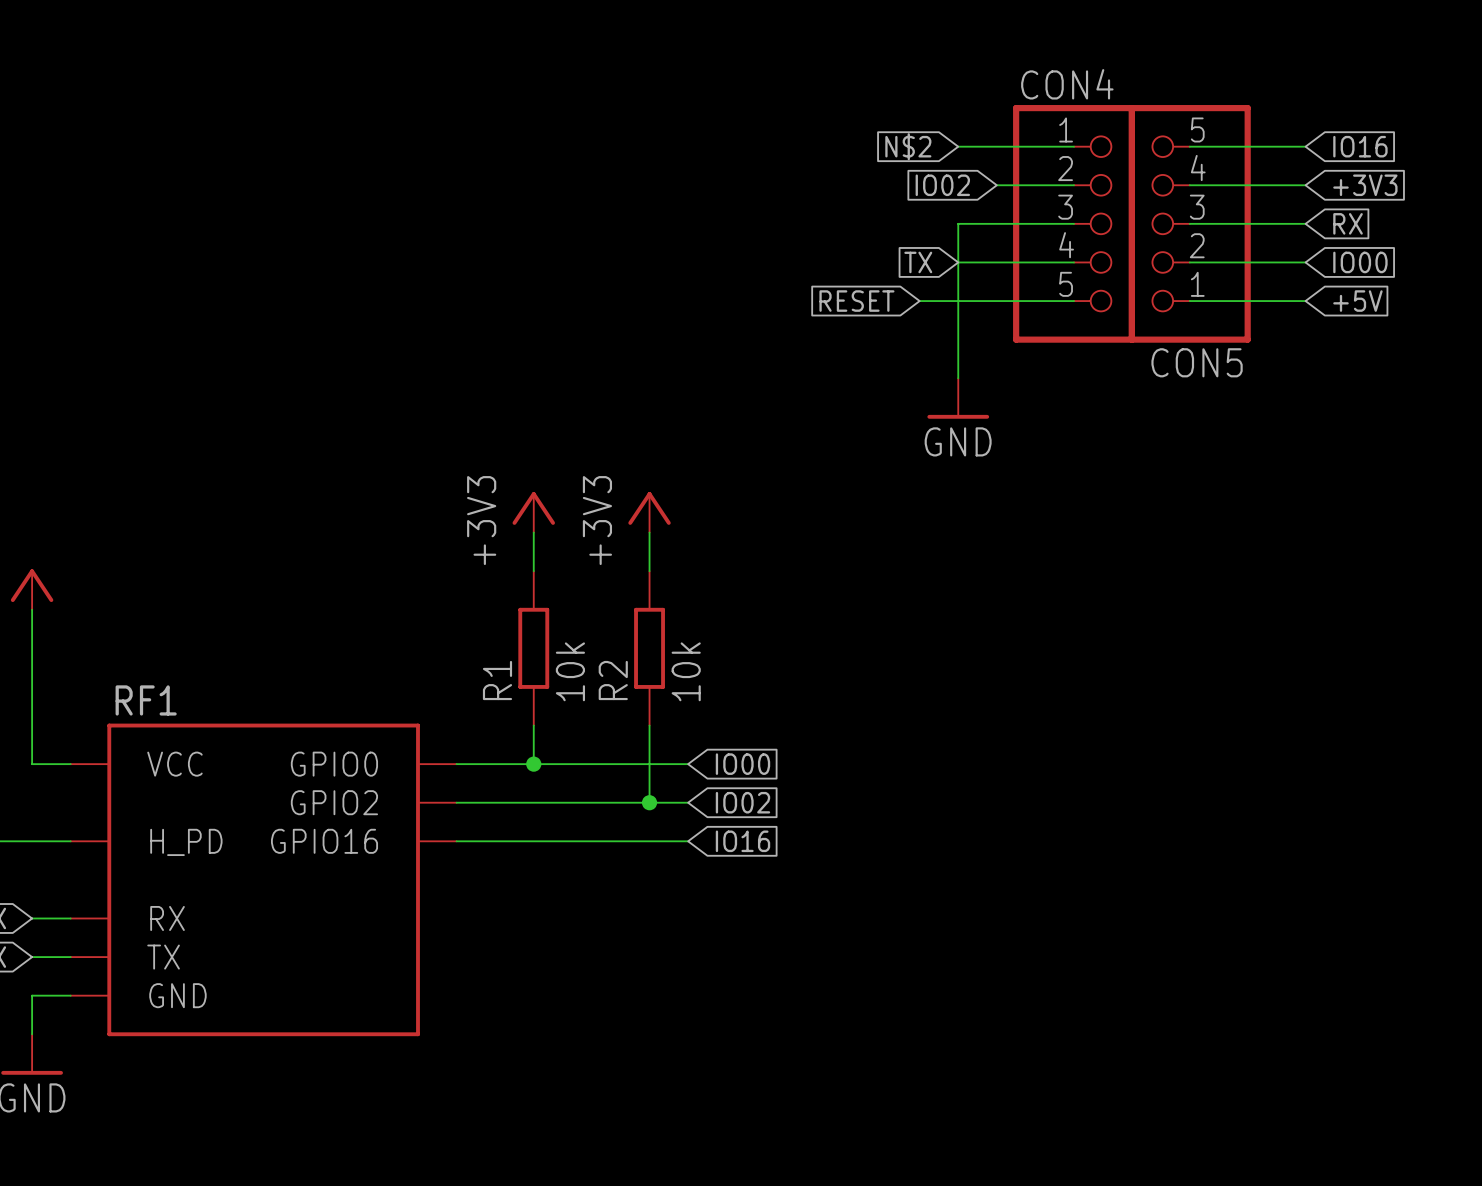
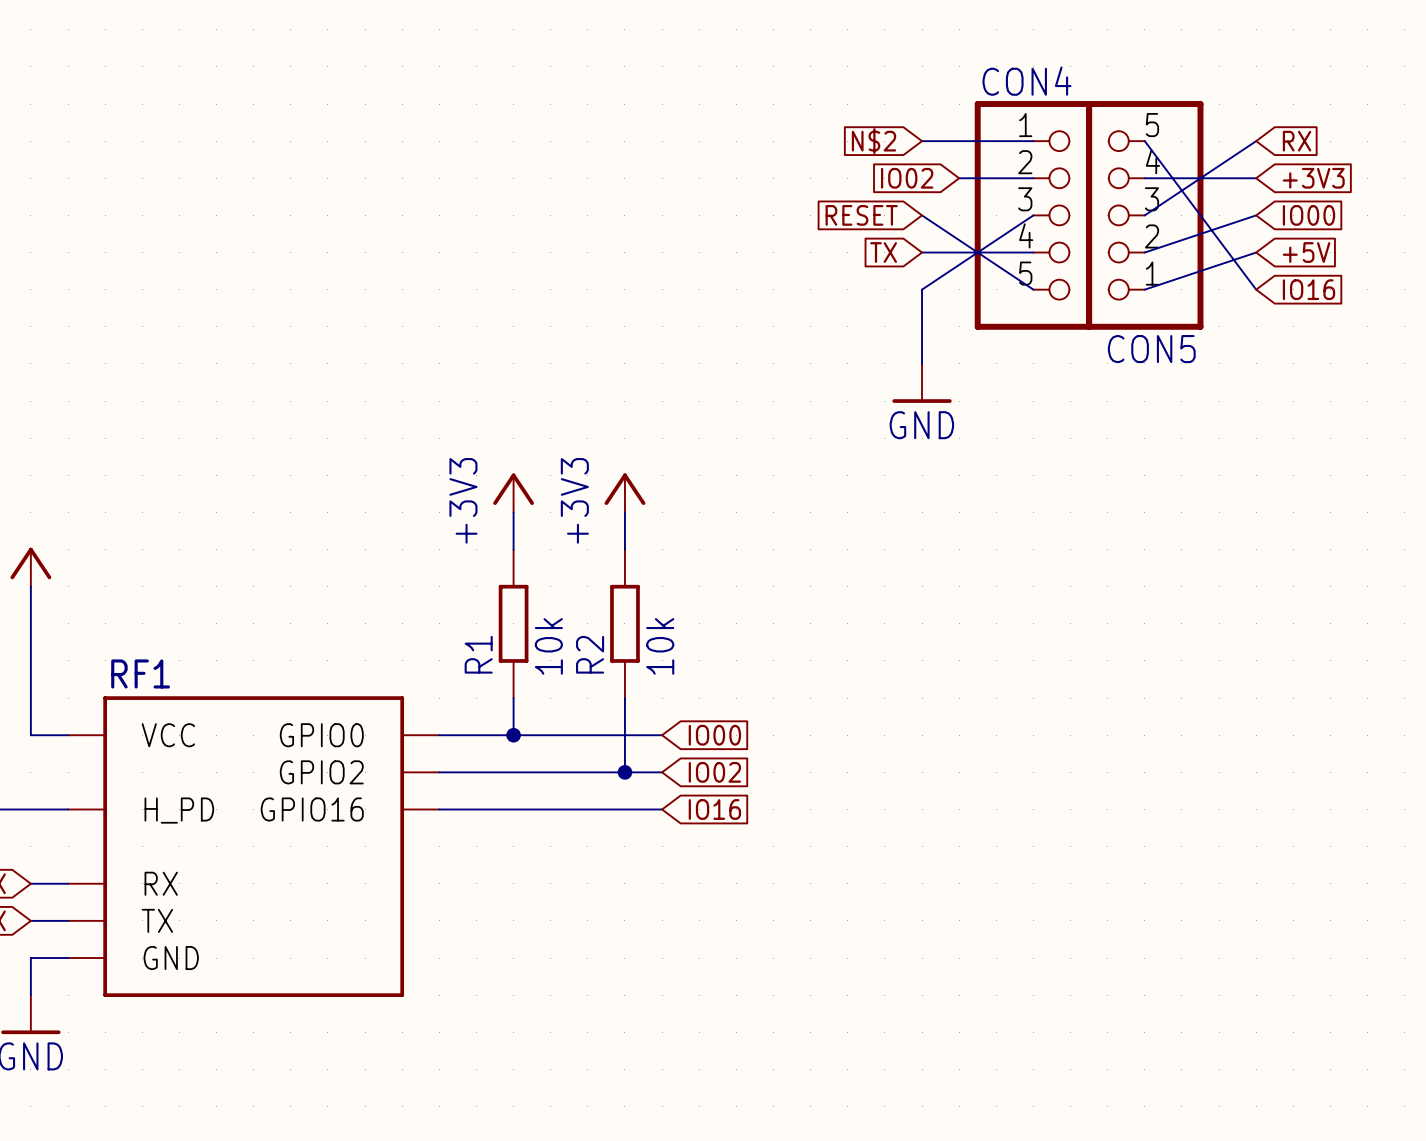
wire: (1189, 146) (1305, 146) -> (1144, 215) (1256, 141)
global label: IO16 (1360, 146) -> RX (1297, 141)
wire: (1074, 223) (958, 223) (958, 301) -> (1033, 215) (922, 289)
wire: (1189, 223) (1305, 223) -> (1144, 252) (1256, 215)
global label: RX (1348, 223) -> IO00 (1308, 215)
wire: (1189, 262) (1305, 262) -> (1144, 289) (1256, 252)
global label: IO00 (1360, 262) -> +5V (1306, 252)
global label position: RESET (856, 301) -> RESET (861, 215)
wire: (919, 301) (1074, 301) -> (922, 215) (1033, 289)
wire: (1189, 301) (1305, 301) -> (1144, 141) (1256, 289)
global label: +5V (1357, 301) -> IO16 (1308, 289)

